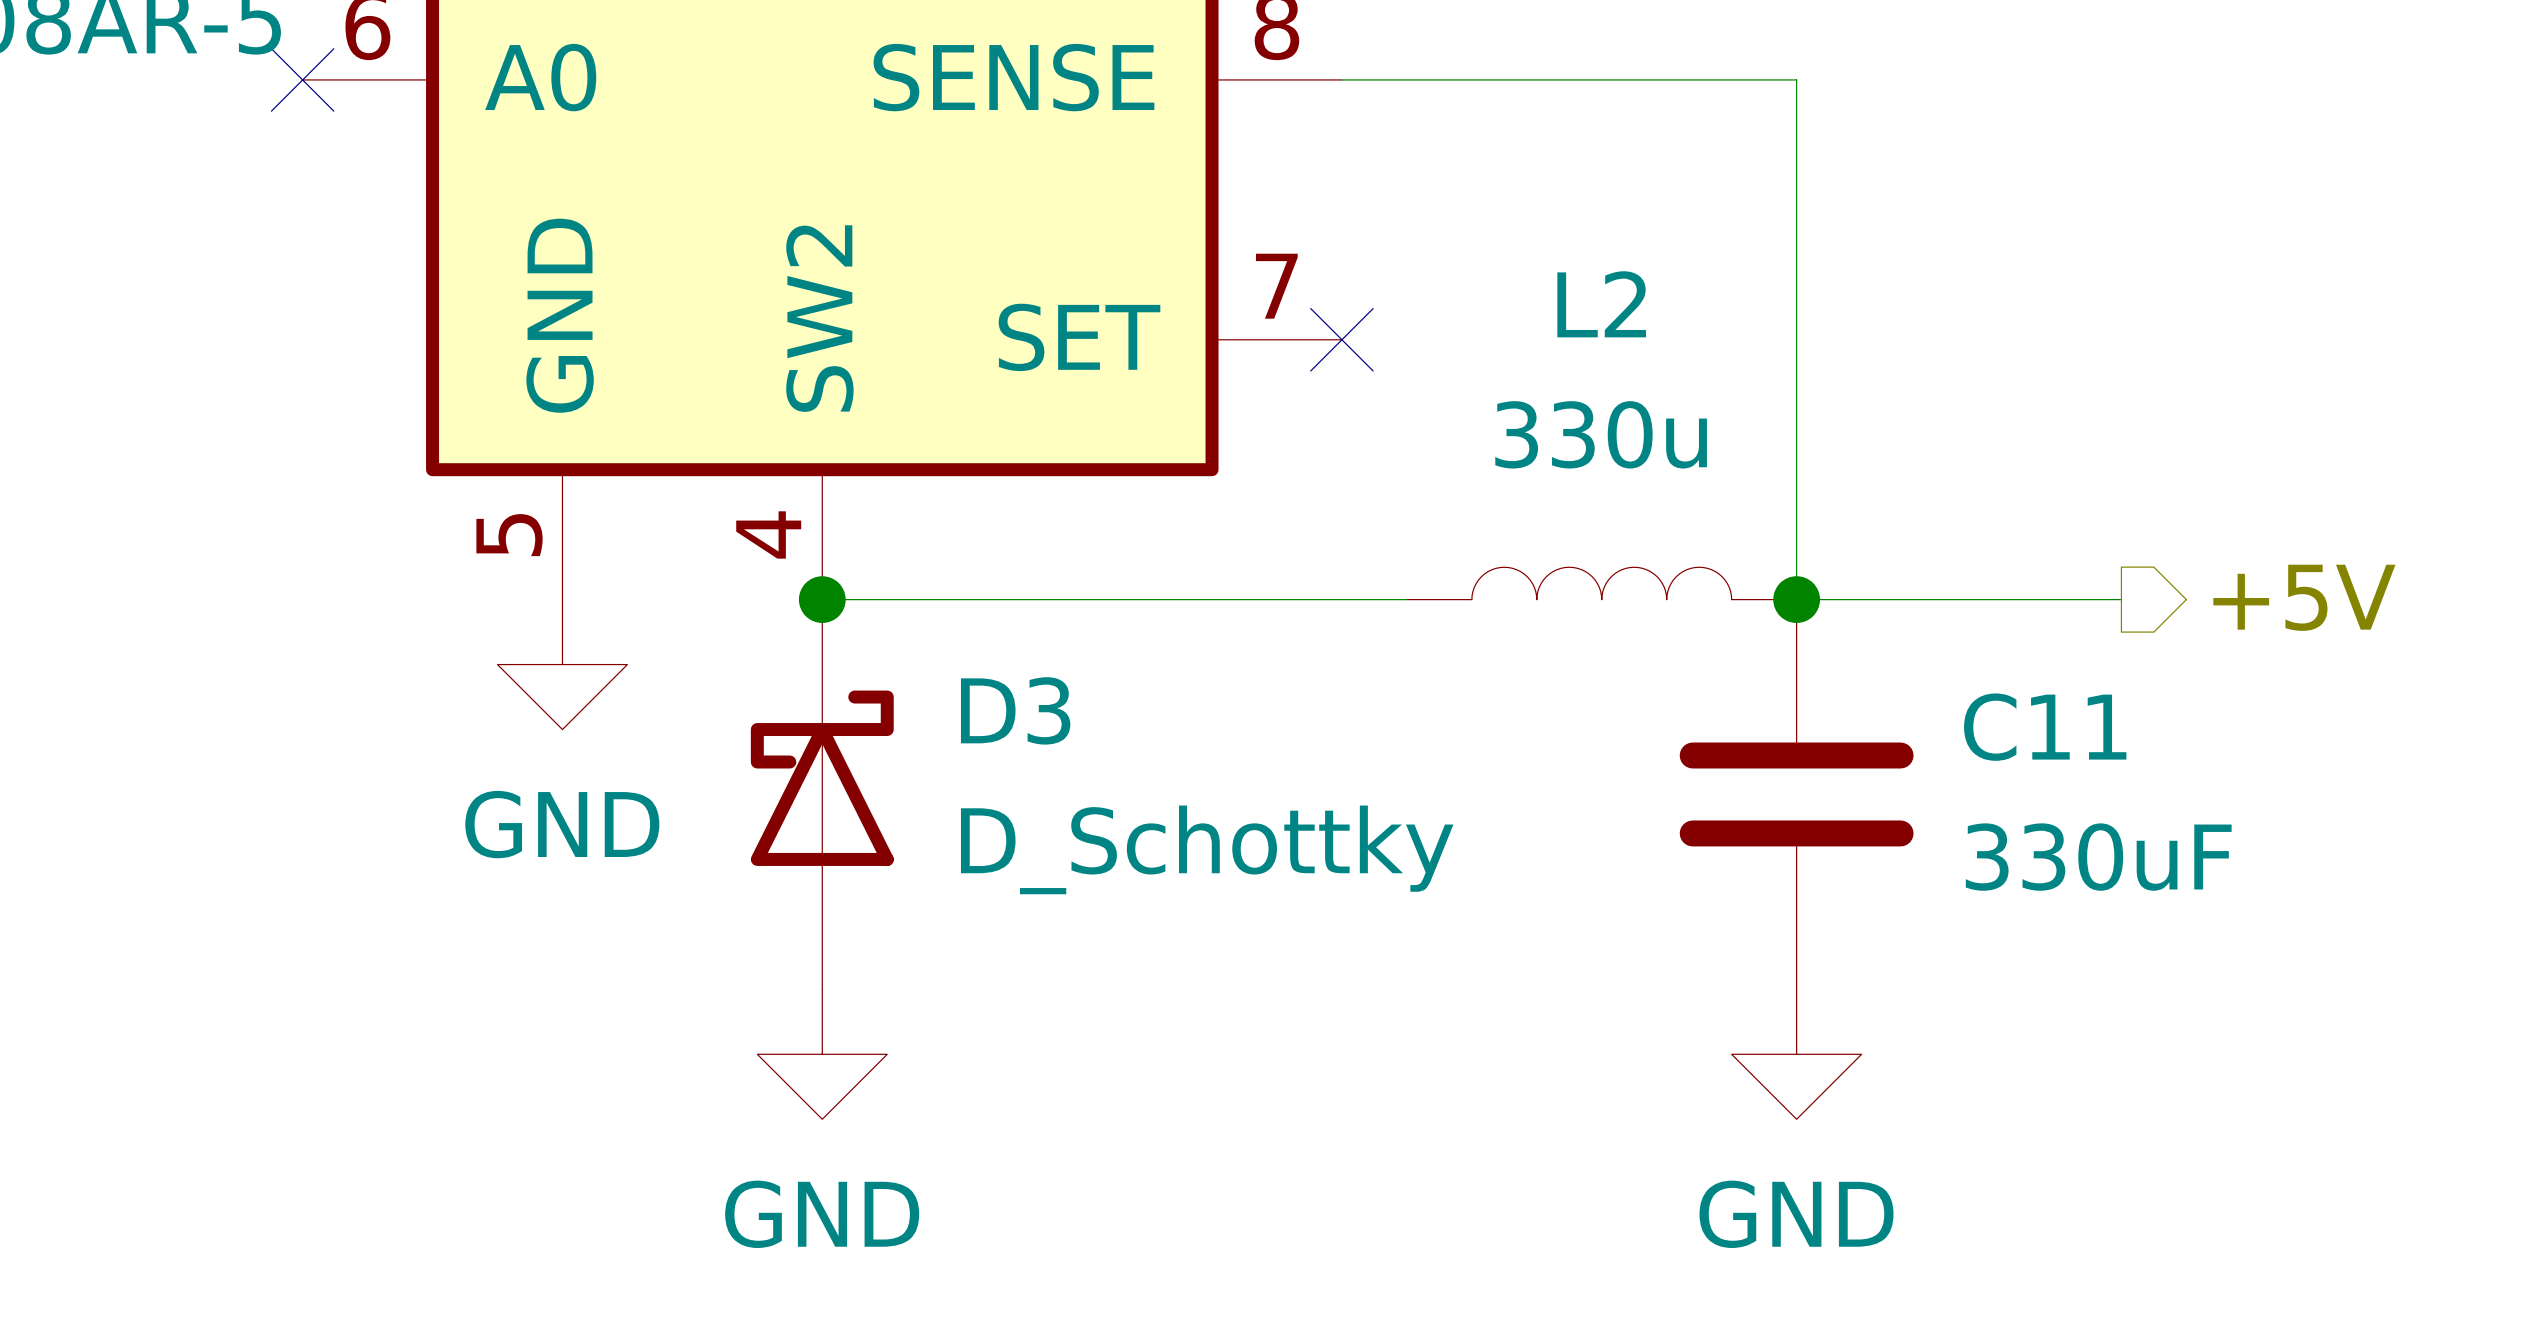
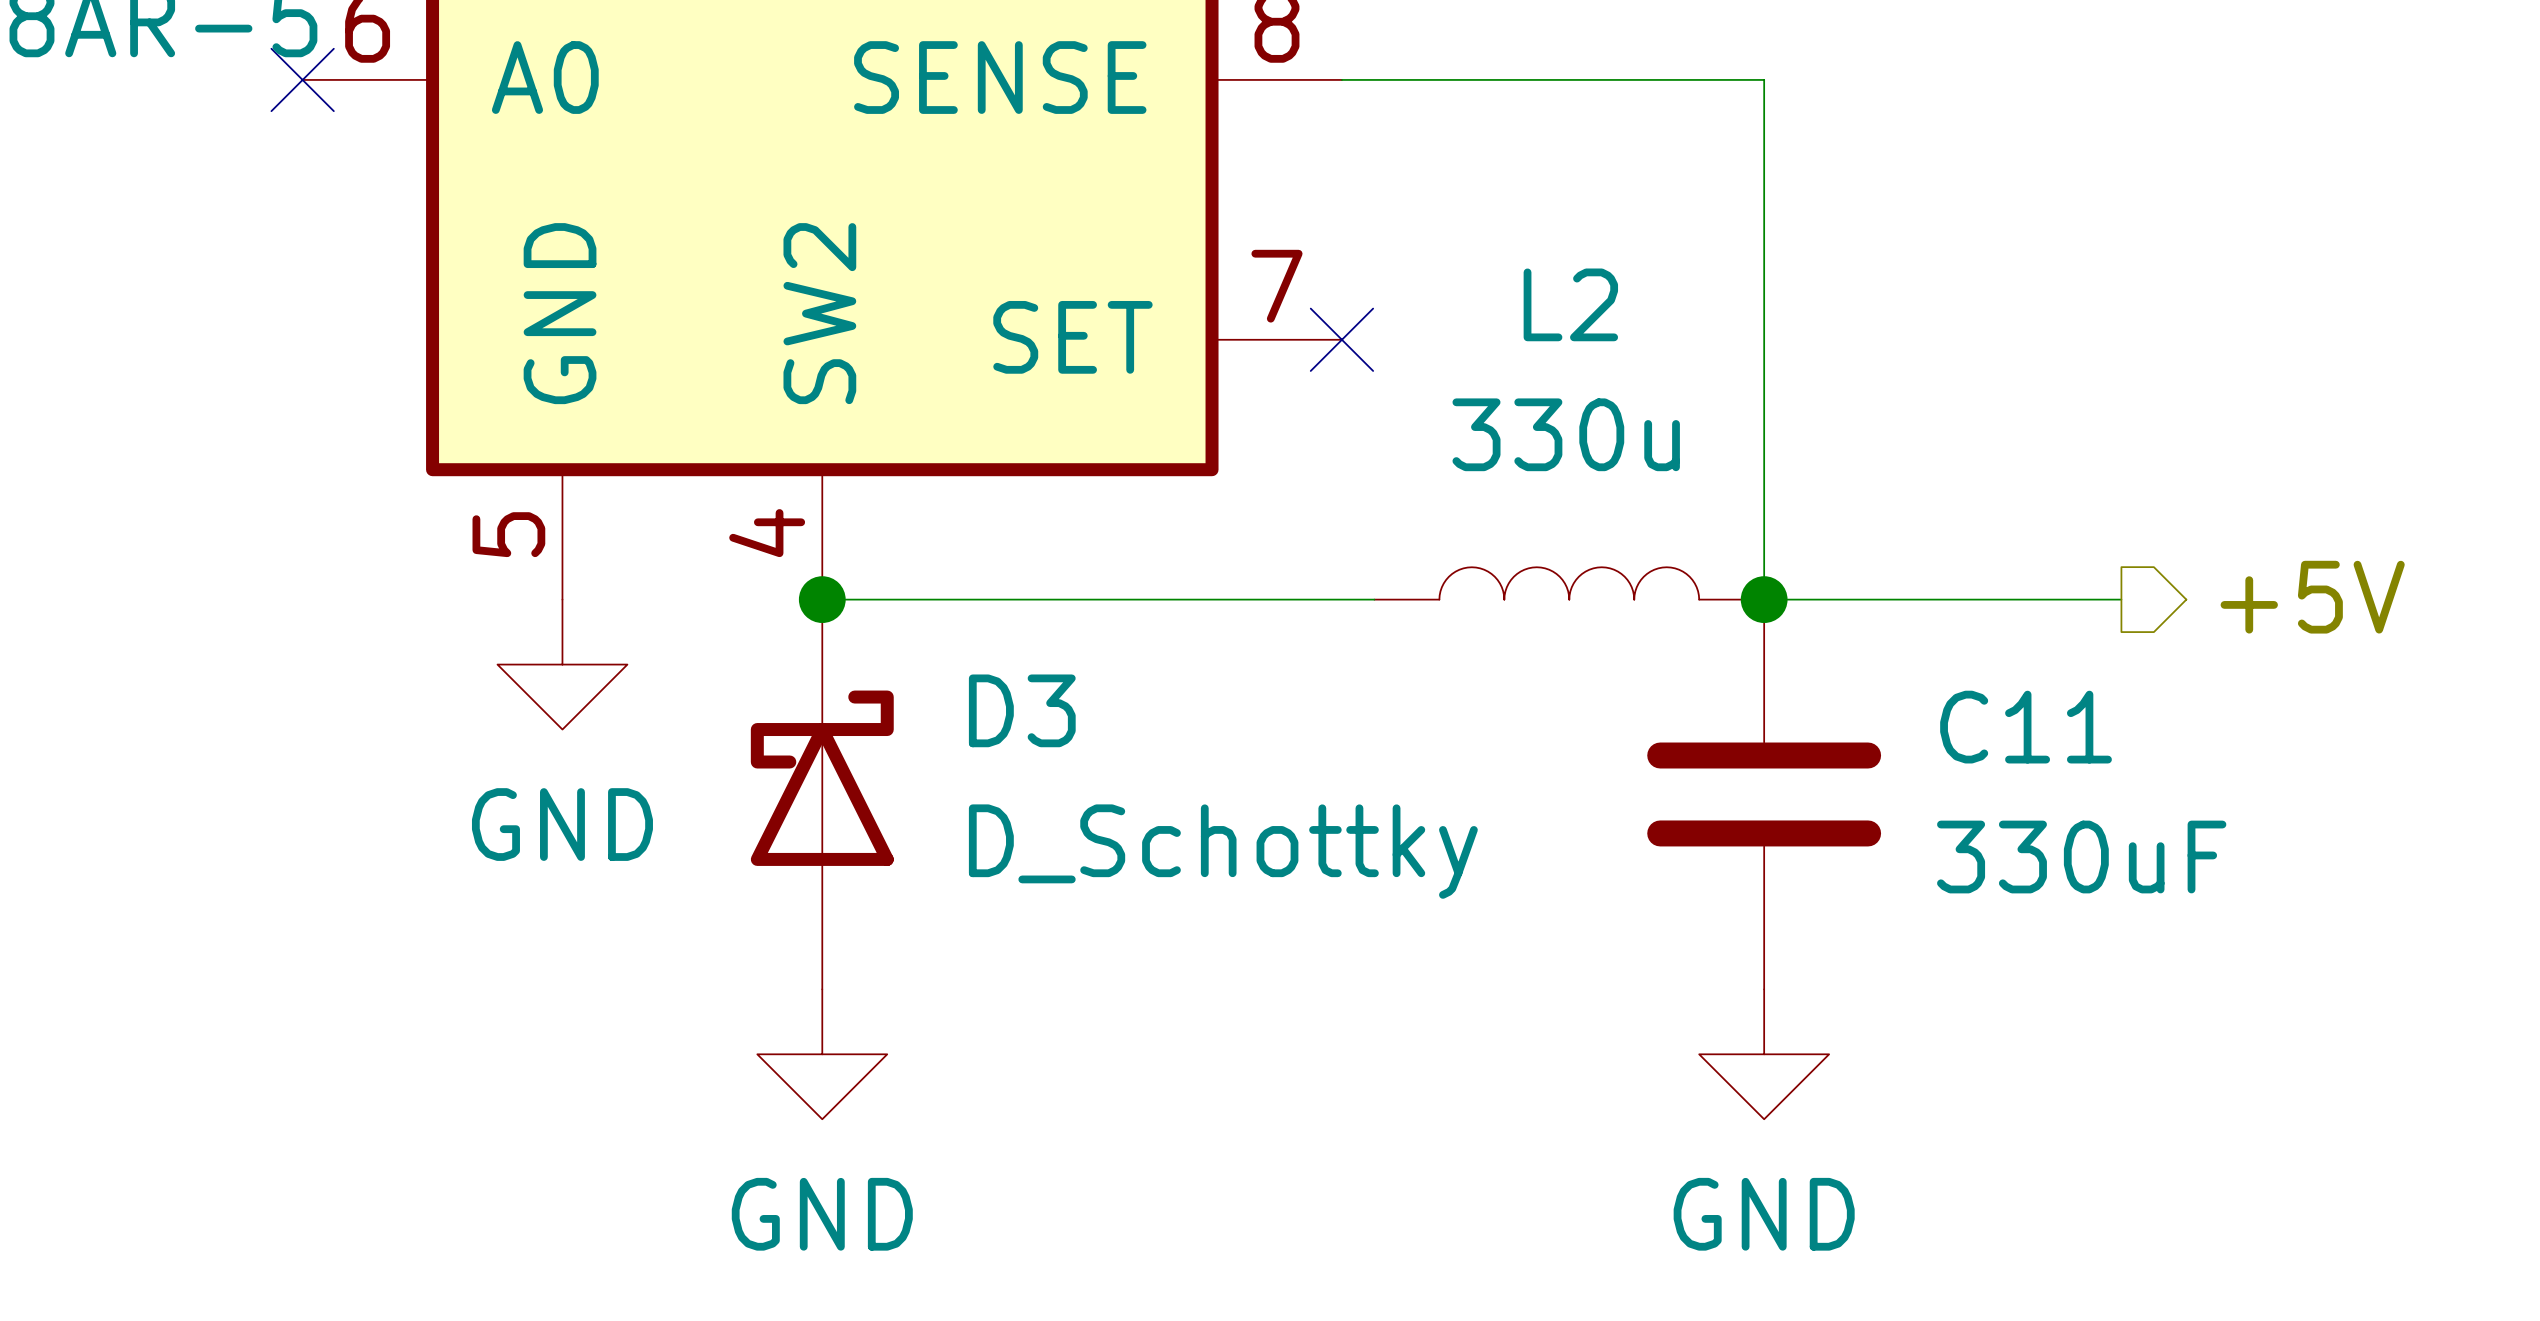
wire: (1764, 79) (1796, 79) (1796, 599) -> (1764, 79) (1764, 599) (1796, 599)
L2 position: (1601, 583) -> (1569, 583)
junction position: (1796, 599) -> (1764, 599)
C11 position: (1796, 794) -> (1764, 794)
power symbol position: GND (1796, 1054) -> GND (1764, 1054)

